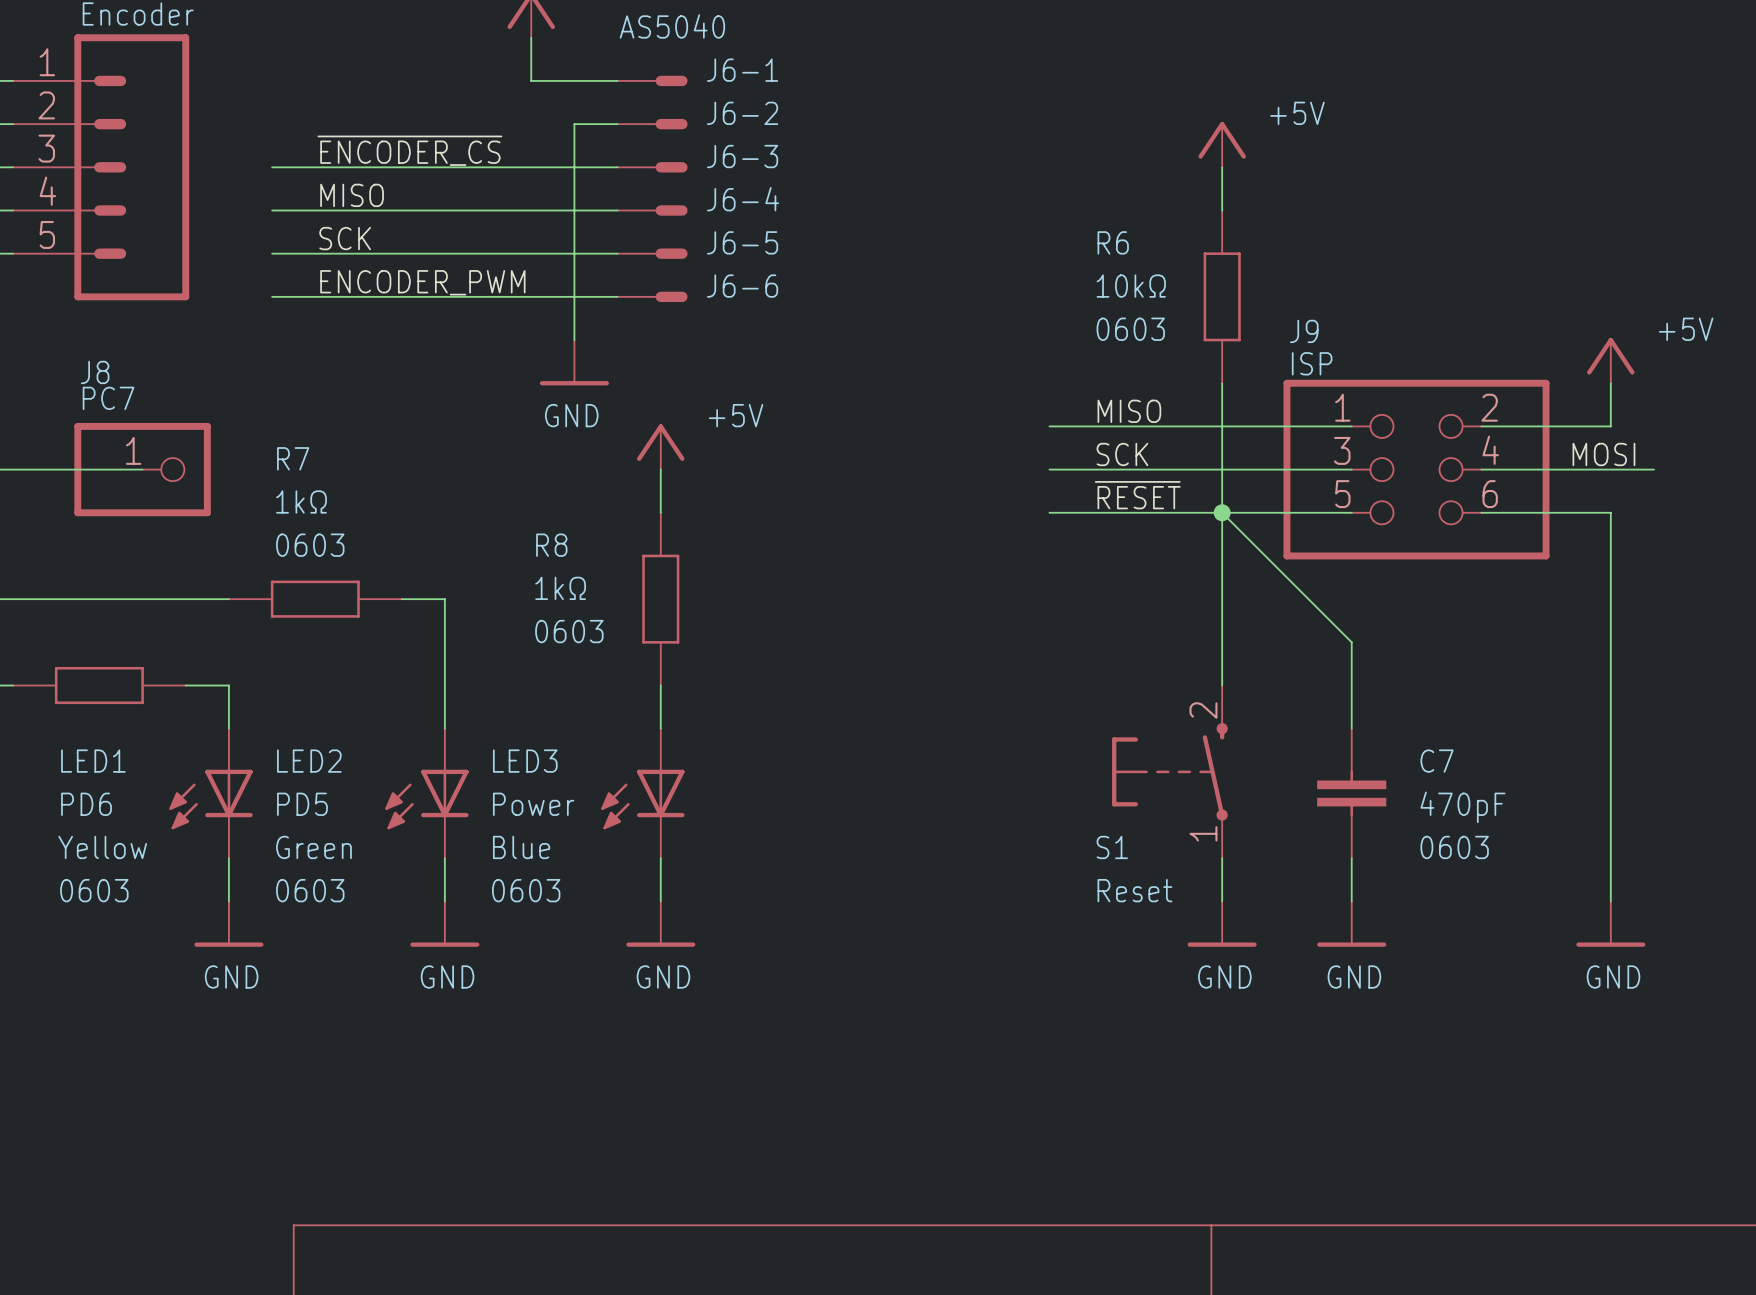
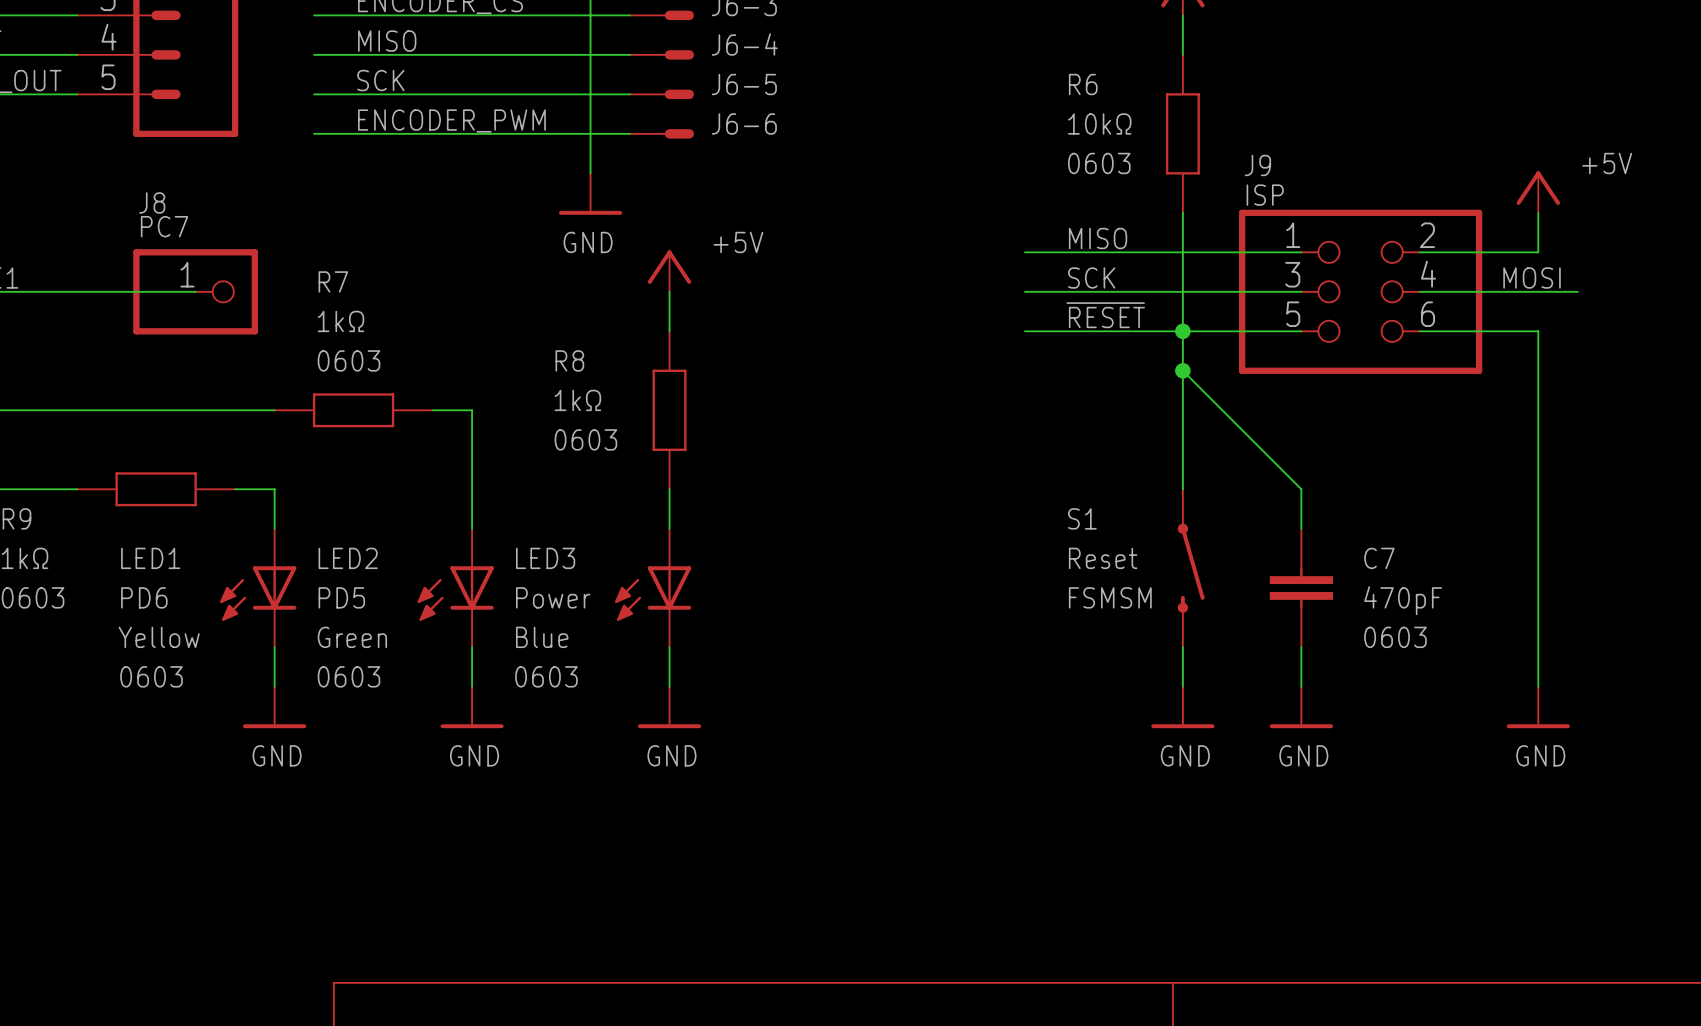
wire: (1222, 512) (1351, 642) (1351, 685) -> (1182, 370) (1301, 489)
junction: none -> (1182, 370)
S1 symbol: [1112, 685, 1228, 859] -> [1177, 489, 1205, 648]
S1 text: none -> FSMSM (1110, 597)
S1 name position: S1 (1112, 847) -> S1 (1082, 518)
S1 value position: Reset (1134, 890) -> Reset (1103, 558)

